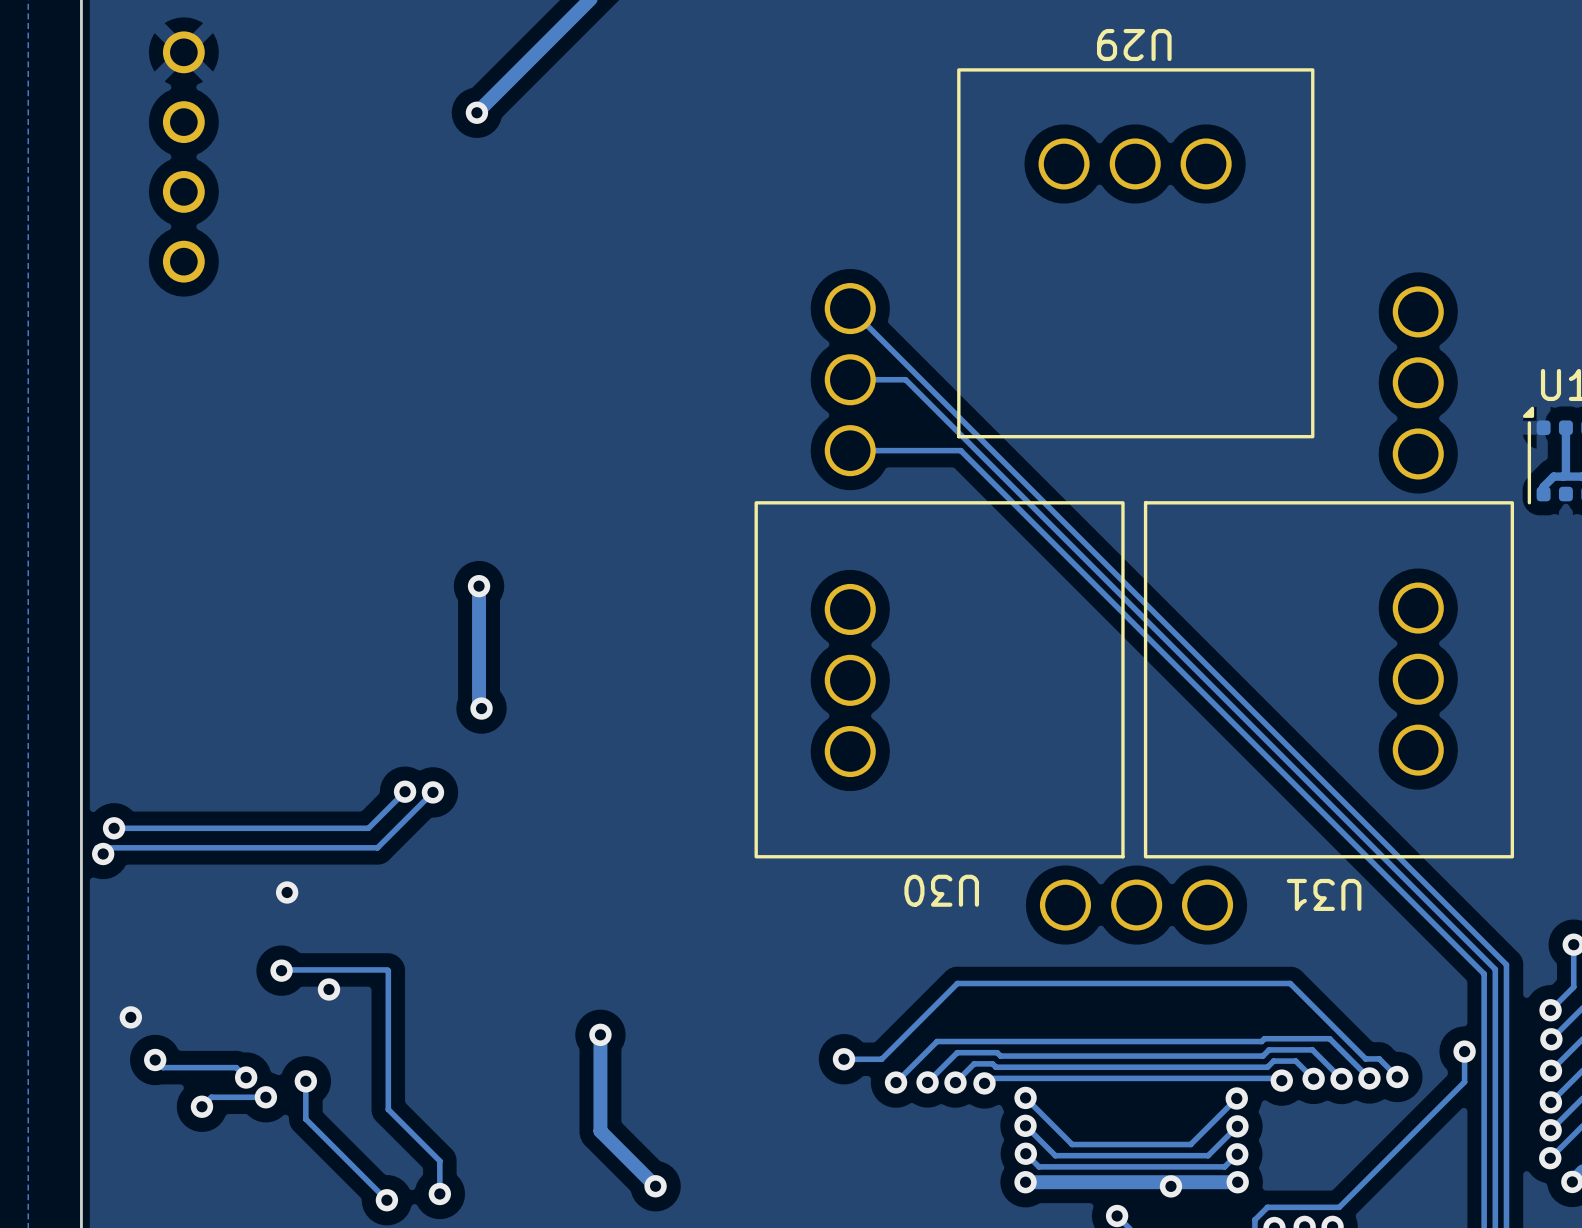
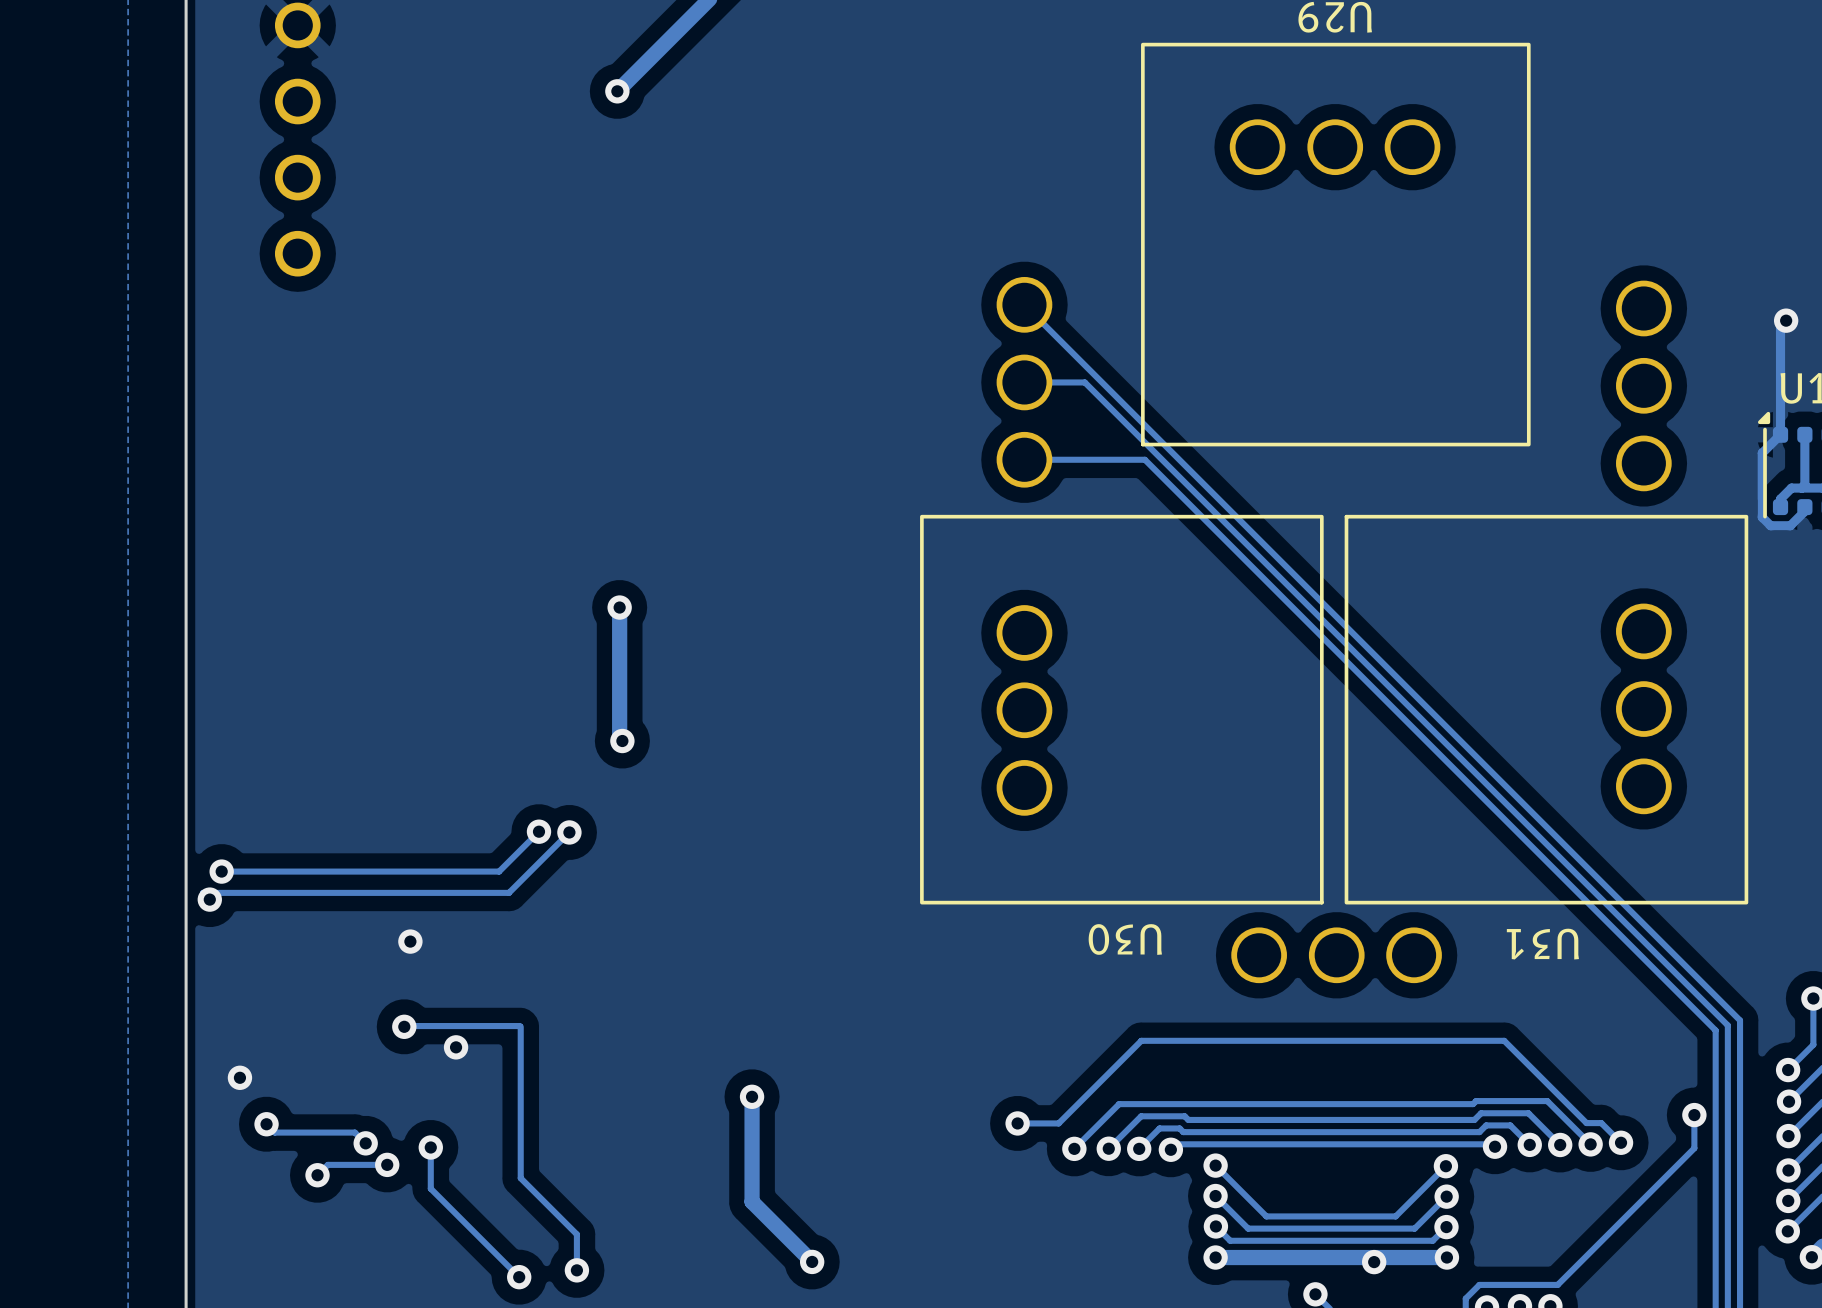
track: none -> (1786, 320) (1780, 326) (1780, 434) (1762, 453) (1762, 517) (1770, 525) (1790, 525) (1804, 511) (1804, 507)
via: none -> (1786, 320)

